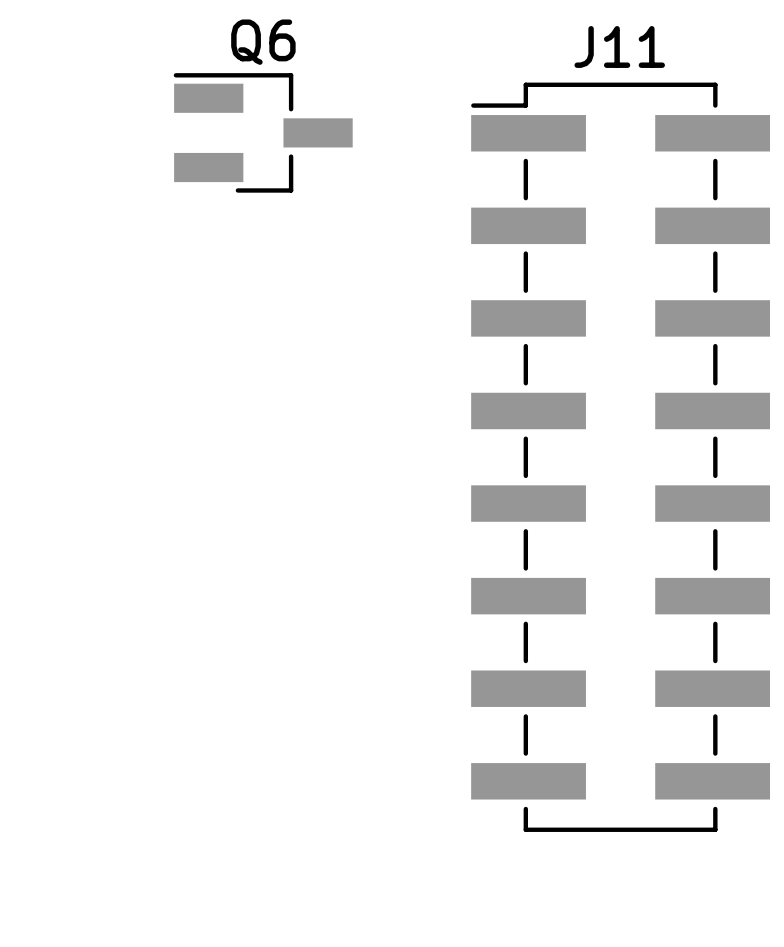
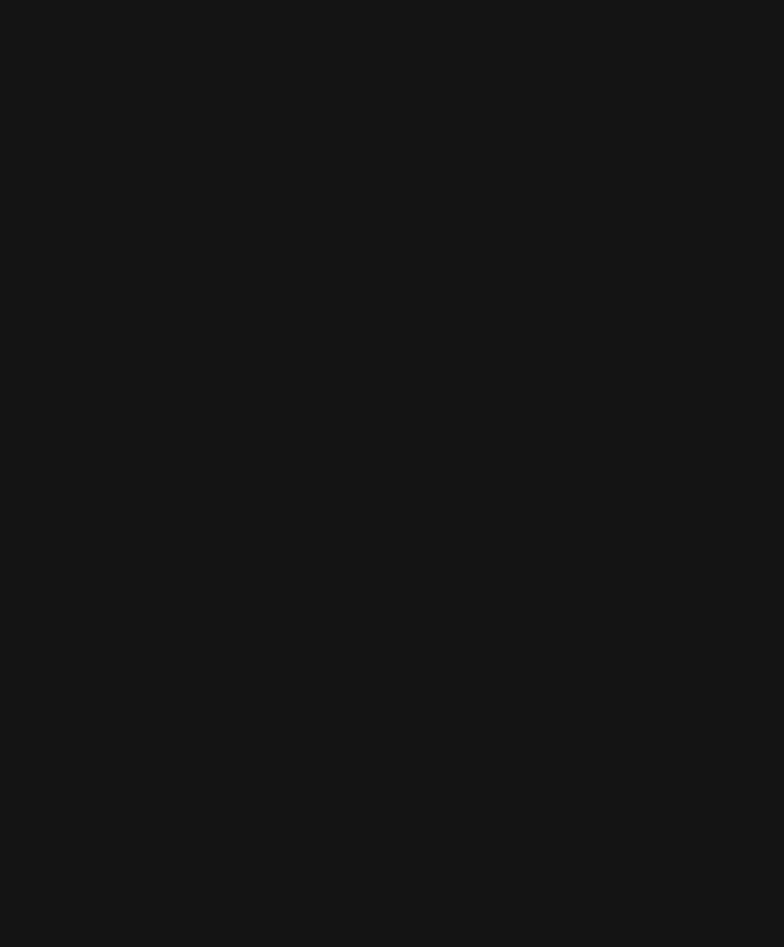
Q6: (263, 132) -> none
J11: (620, 457) -> none

